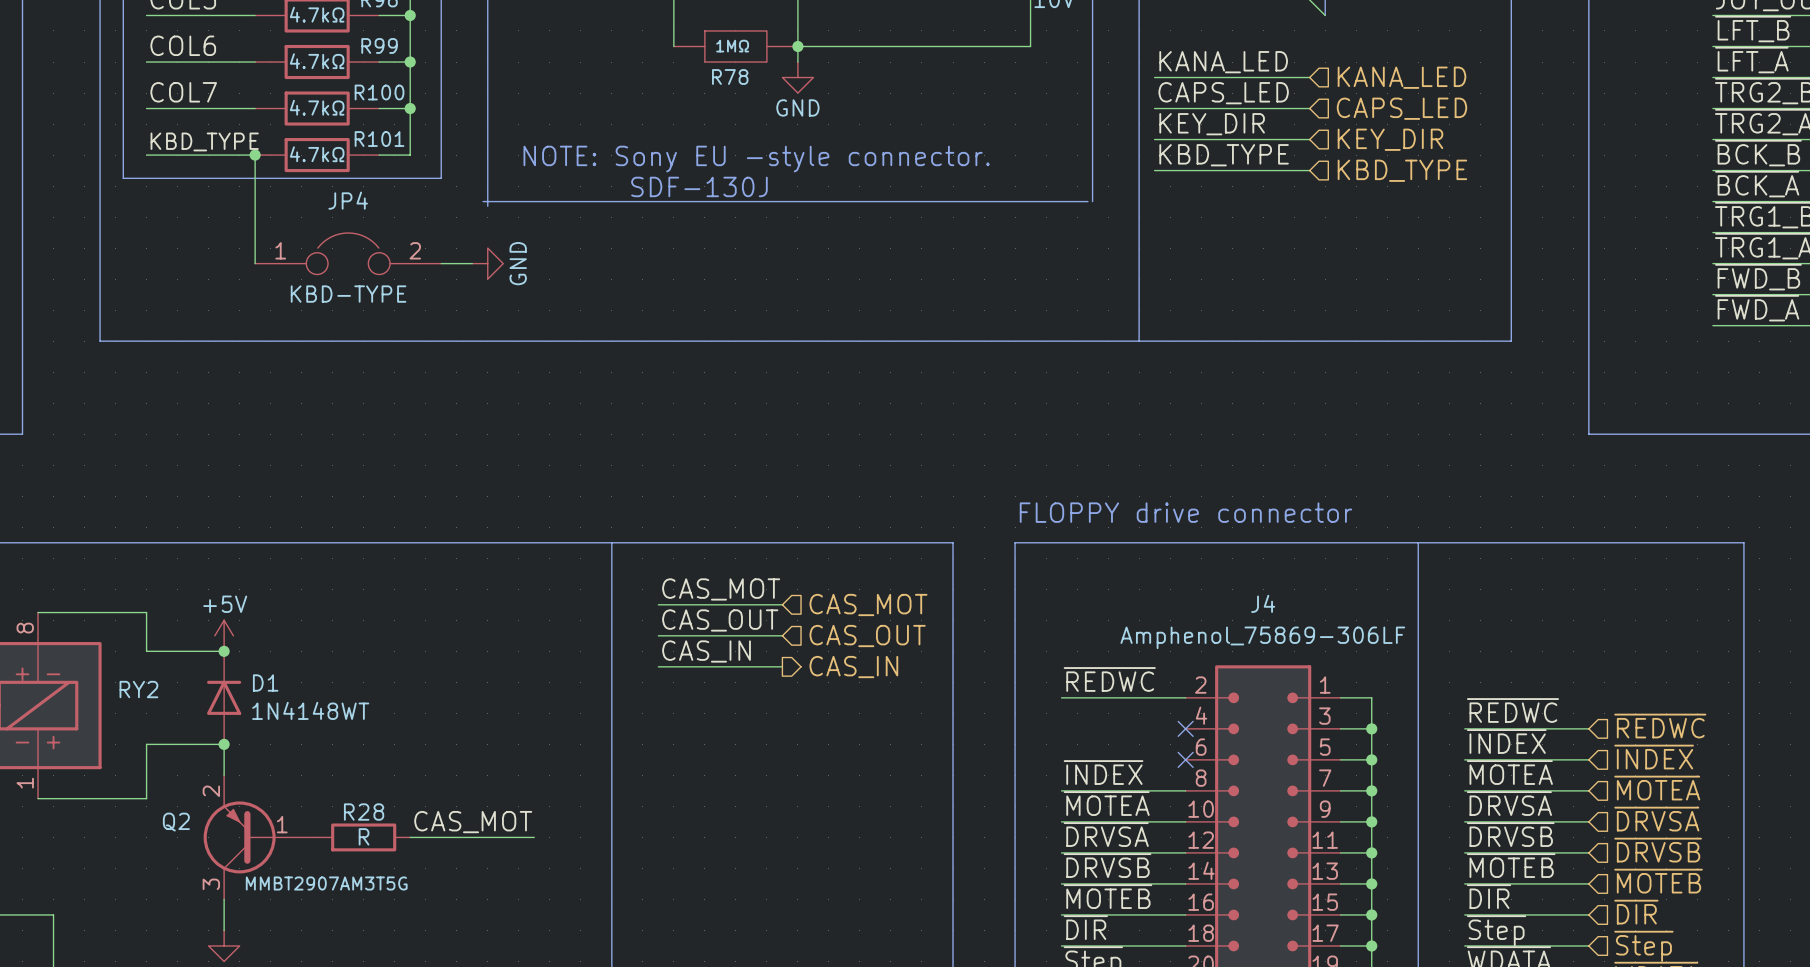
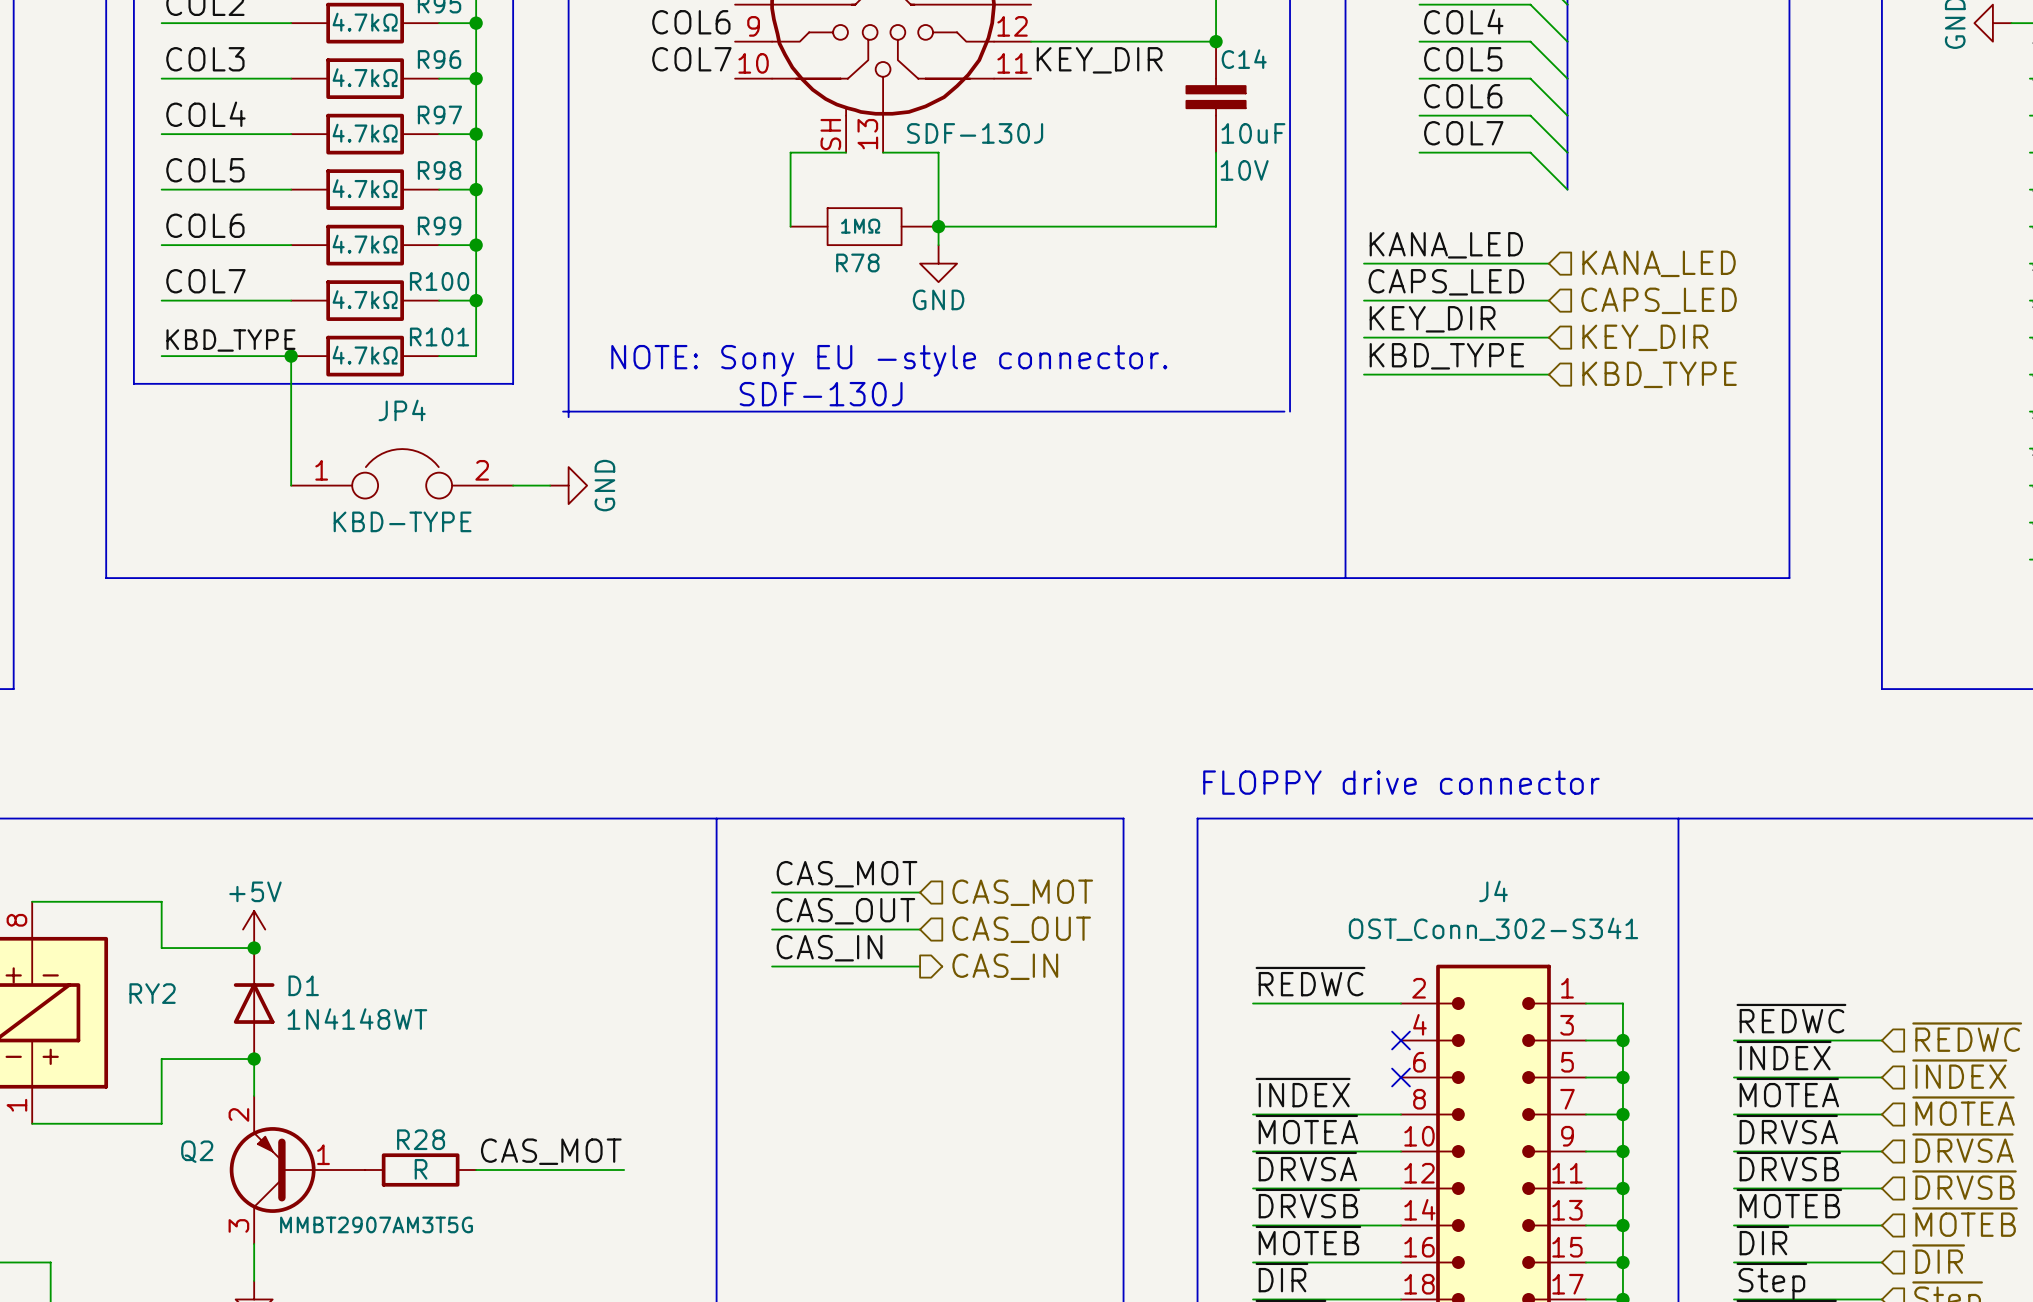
J4 value: Amphenol_75869-306LF (1262, 637) -> OST_Conn_302-S341 (1493, 929)

